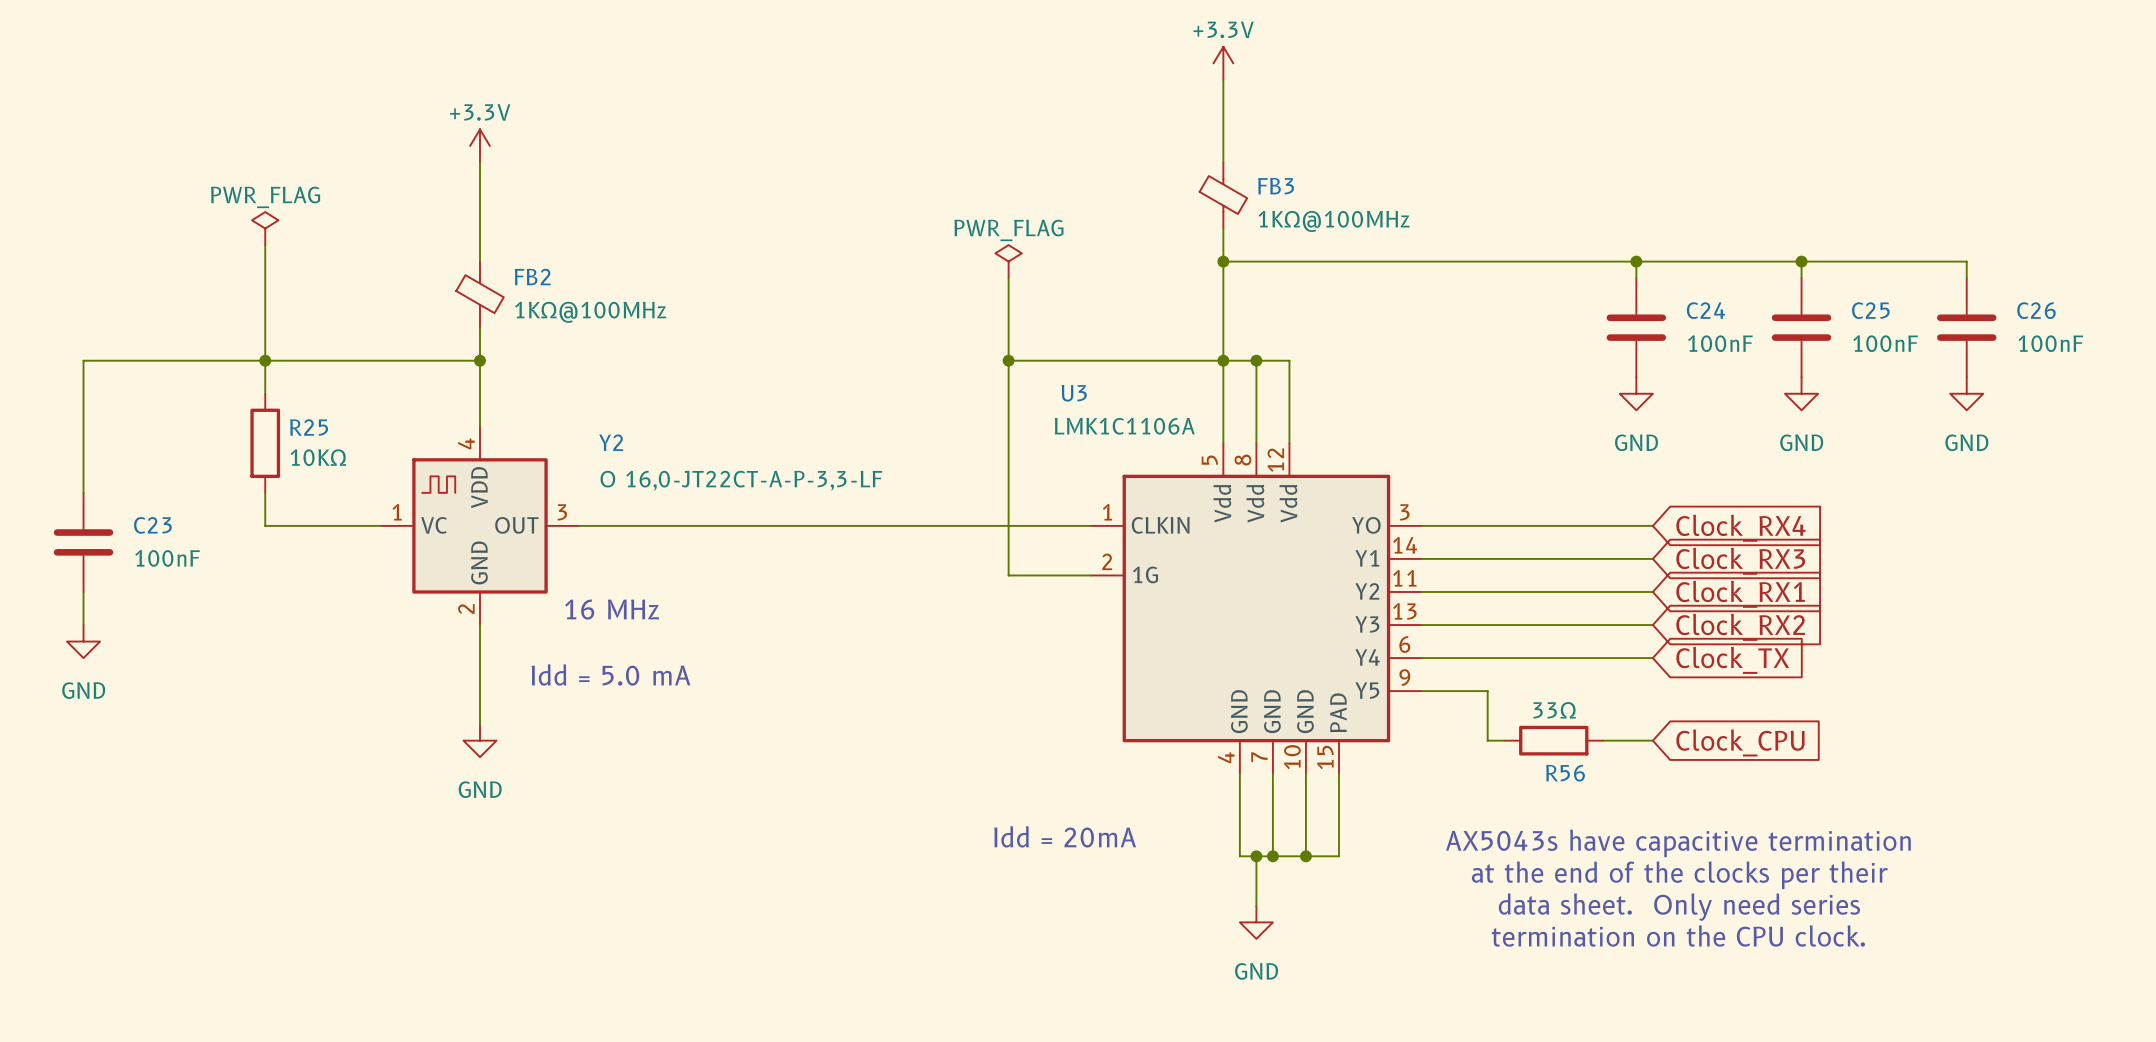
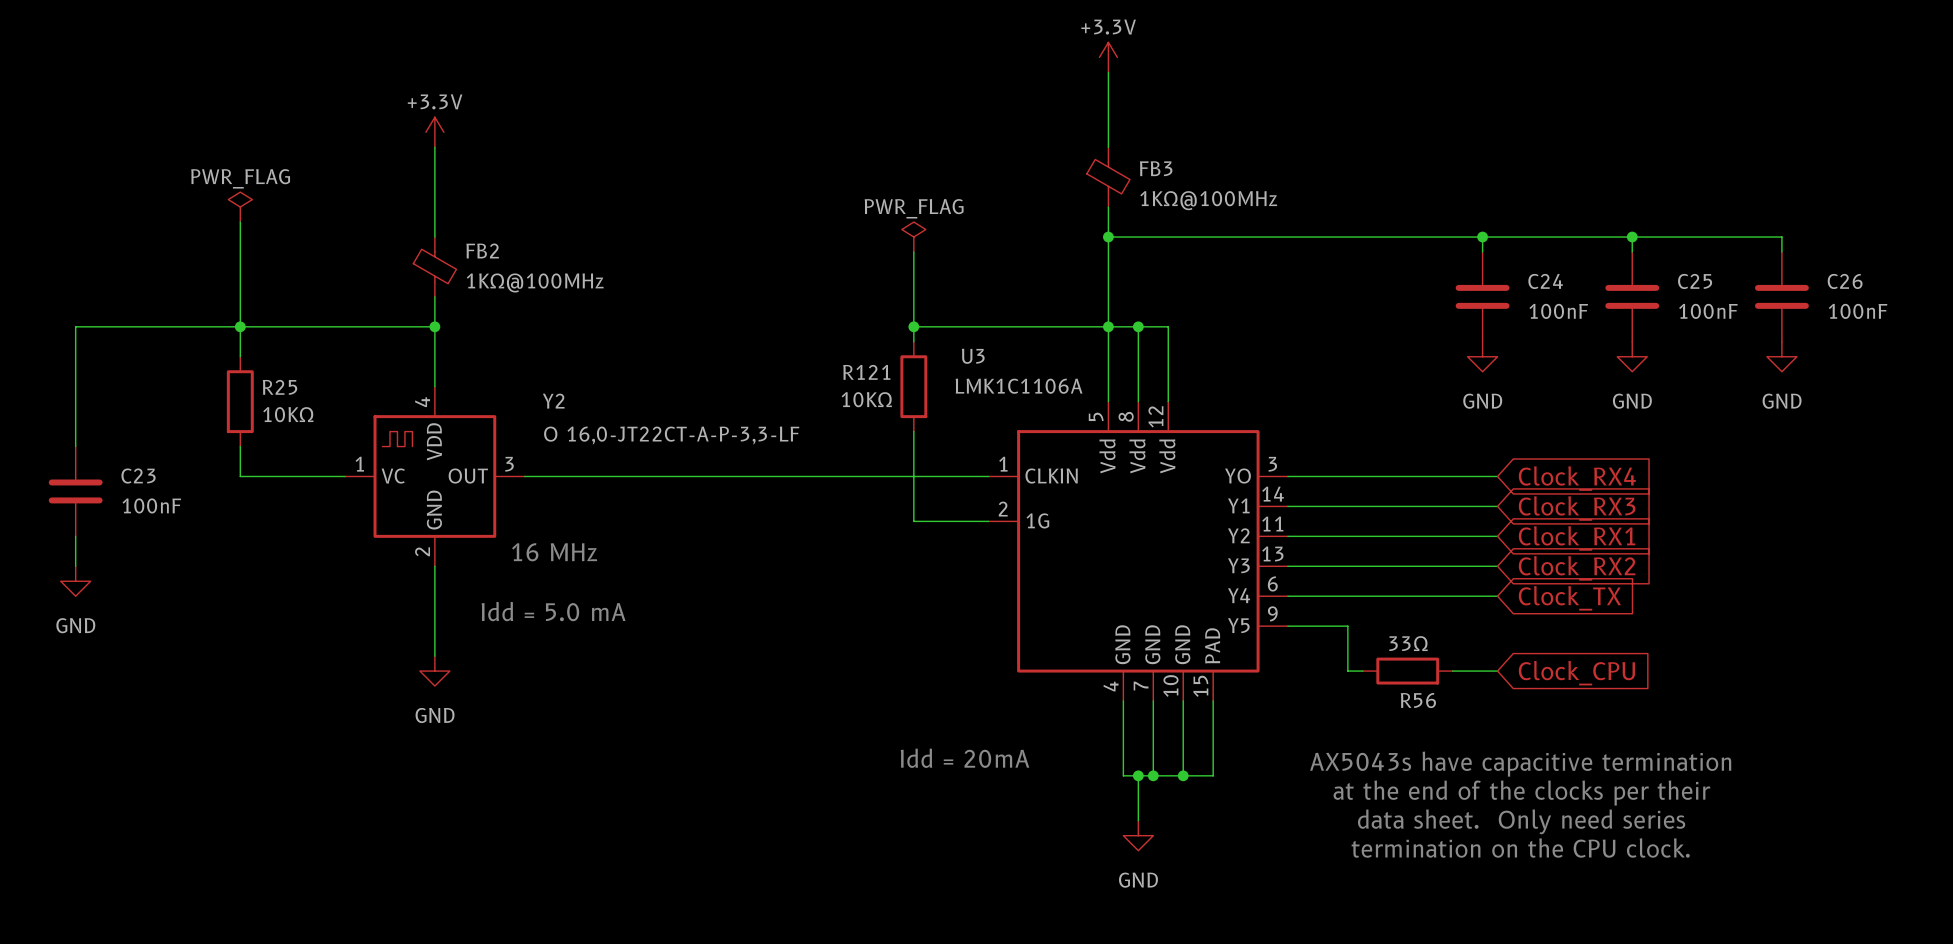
wire: (1008, 377) (1008, 476) -> none
R121: none -> 10KΩ (913, 386)

